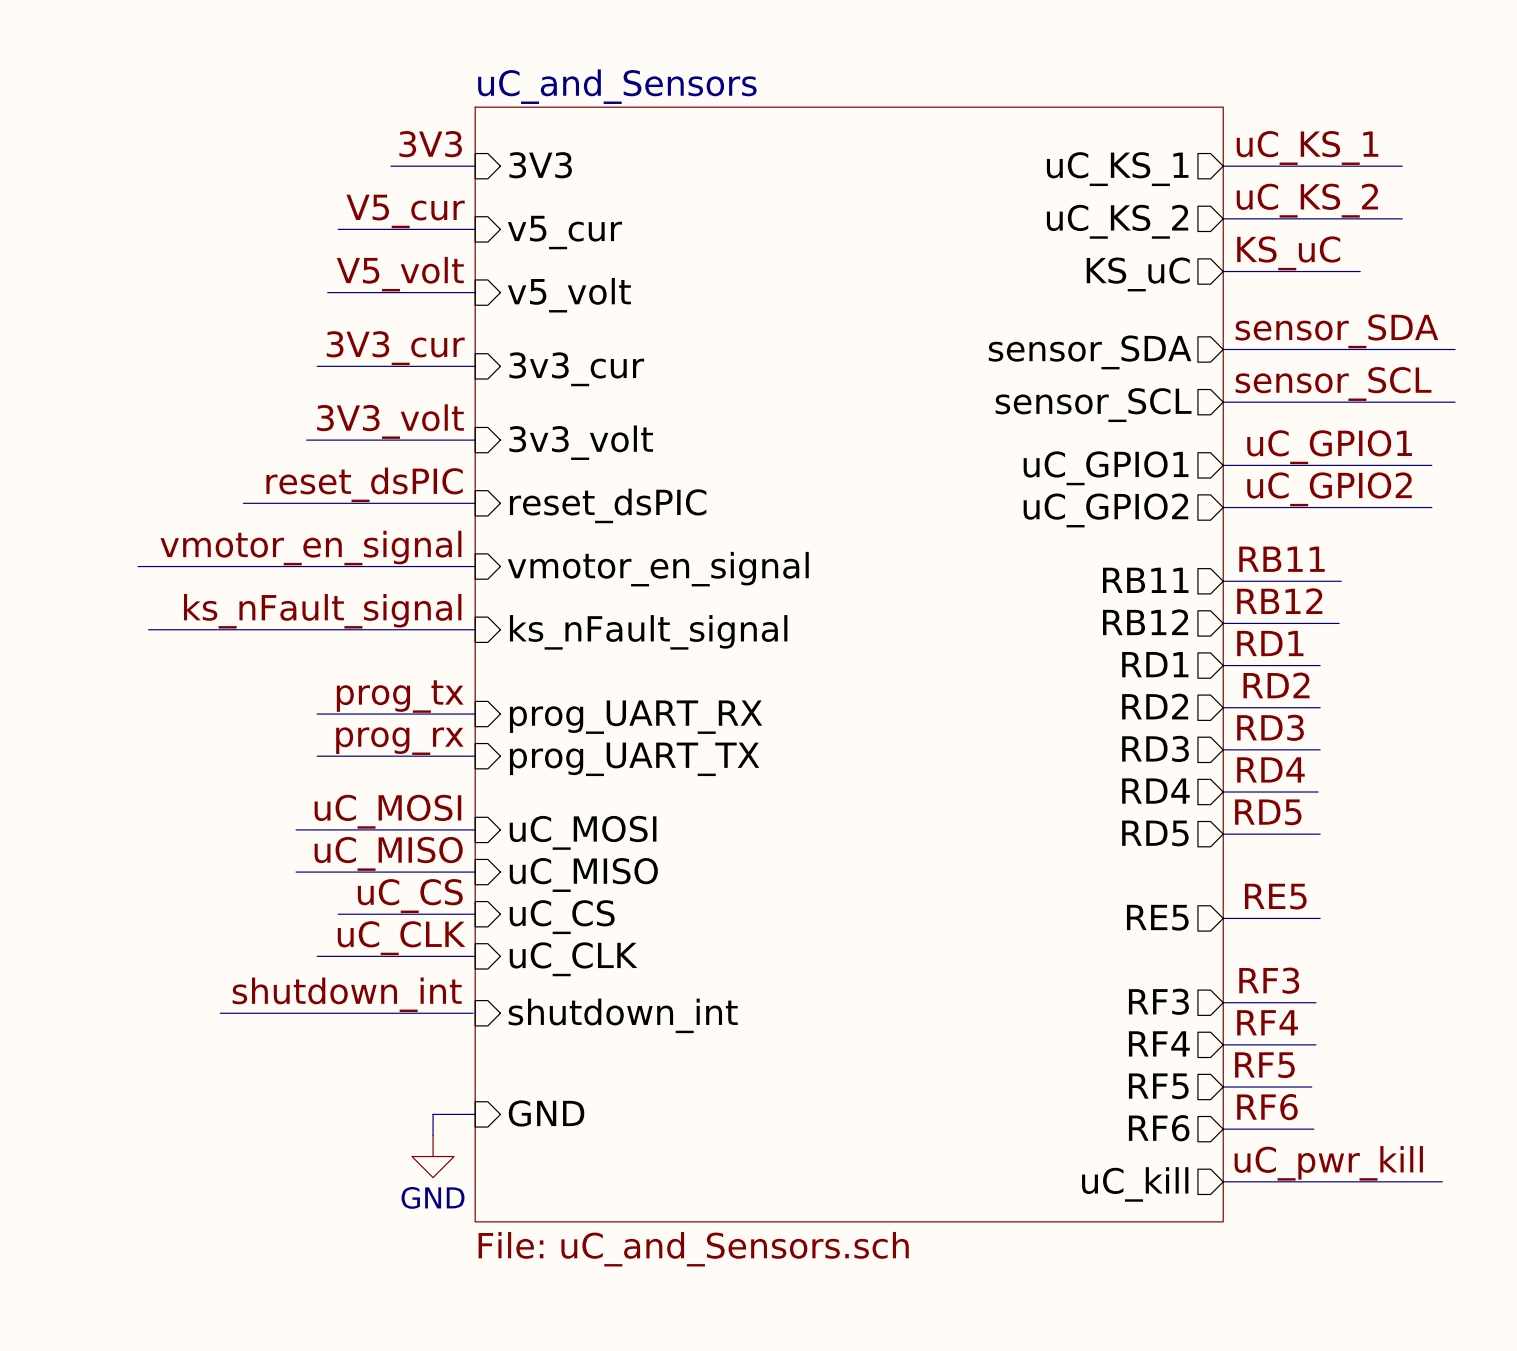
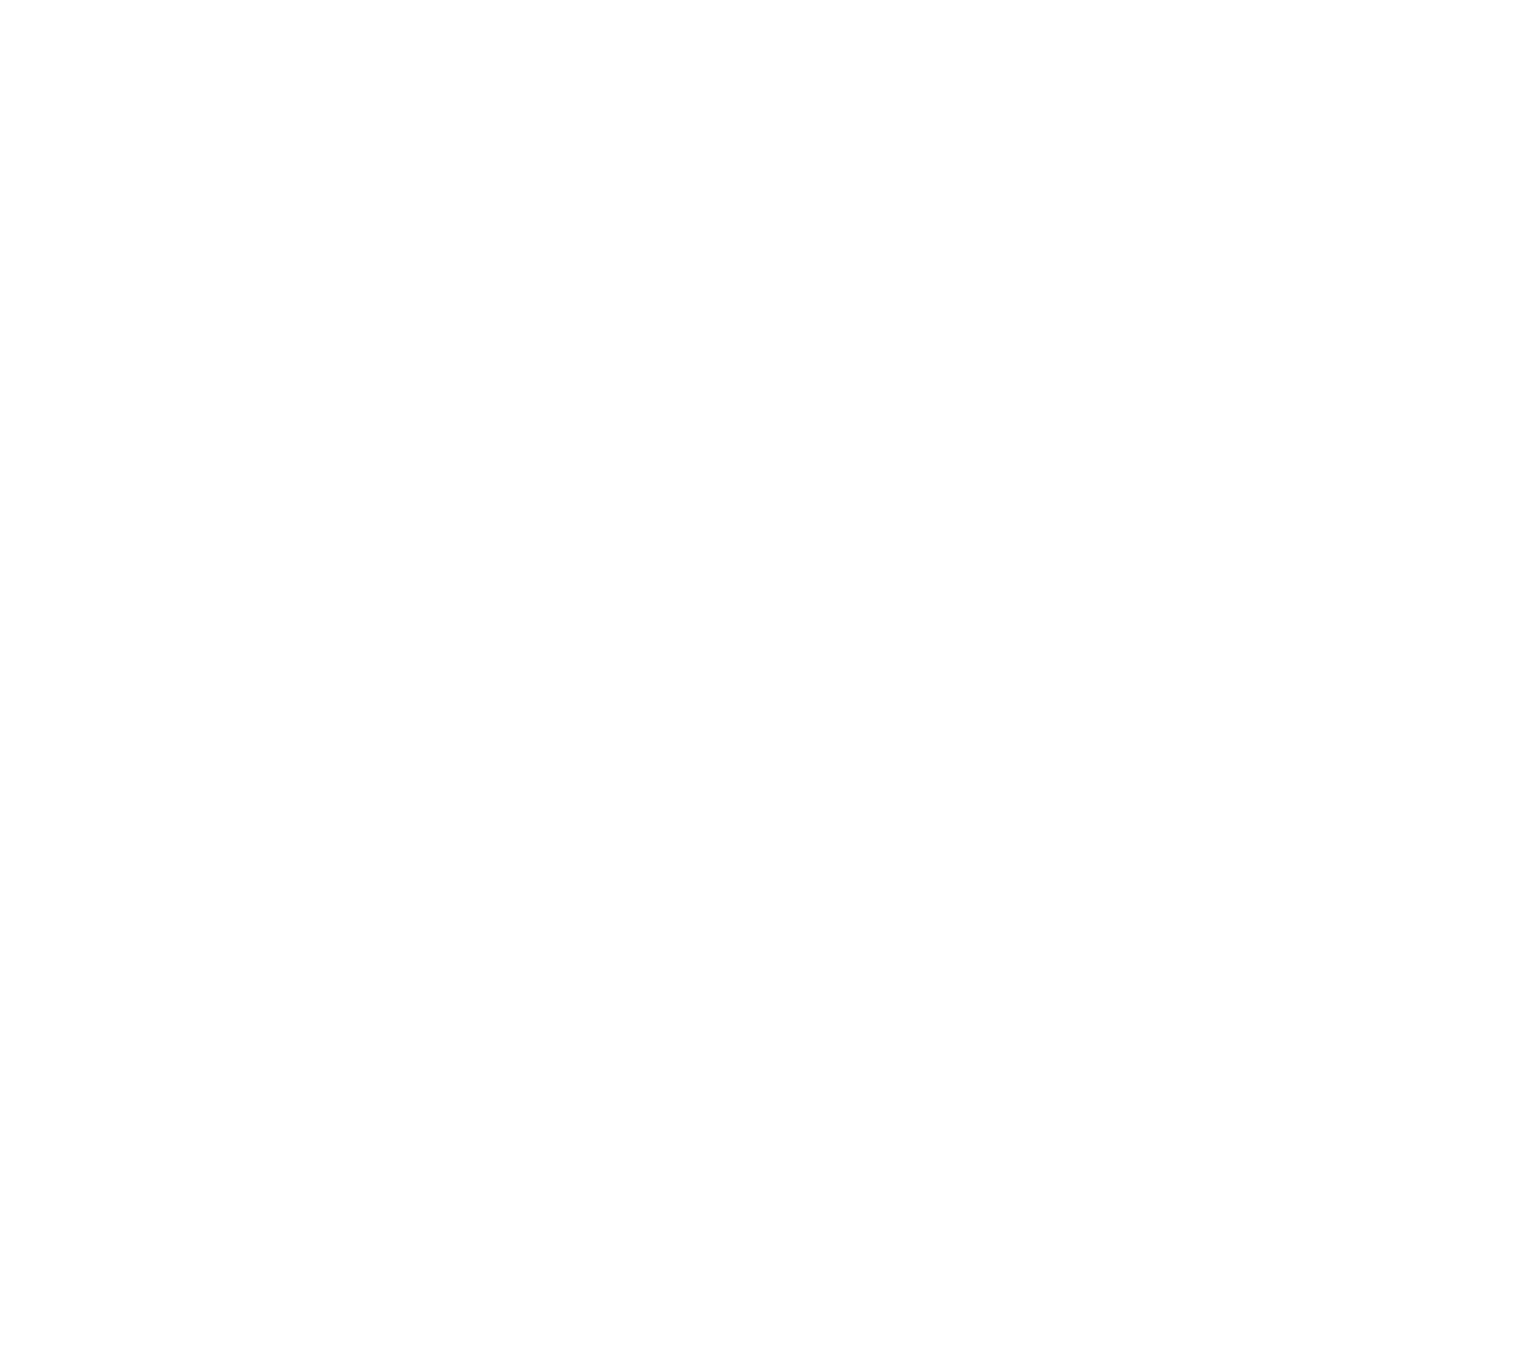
label: 3V3 (430, 144) -> none
label: uC_KS_1 (1307, 147) -> none
sheet pin: 3V3 (540, 165) -> none
wire: (390, 166) (475, 166) -> none
wire: (1223, 166) (1402, 166) -> none
sheet pin: uC_KS_1 (1117, 169) -> none
label: uC_KS_2 (1307, 200) -> none
label: V5_cur (405, 211) -> none
wire: (1223, 218) (1402, 218) -> none
sheet pin: uC_KS_2 (1117, 221) -> none
wire: (338, 229) (475, 229) -> none
sheet pin: v5_cur (564, 232) -> none
label: KS_uC (1288, 253) -> none
wire: (1223, 271) (1360, 271) -> none
label: V5_volt (400, 274) -> none
sheet pin: KS_uC (1138, 274) -> none
wire: (327, 292) (475, 292) -> none
sheet pin: v5_volt (569, 295) -> none
label: sensor_SDA (1336, 331) -> none
label: 3V3_cur (395, 348) -> none
wire: (1223, 349) (1455, 349) -> none
sheet pin: sensor_SDA (1090, 352) -> none
wire: (317, 366) (475, 366) -> none
sheet pin: 3v3_cur (576, 369) -> none
label: sensor_SCL (1333, 383) -> none
wire: (1223, 402) (1455, 402) -> none
sheet pin: sensor_SCL (1093, 405) -> none
label: 3V3_volt (390, 421) -> none
wire: (306, 440) (475, 440) -> none
sheet pin: 3v3_volt (581, 442) -> none
label: uC_GPIO1 (1329, 447) -> none
wire: (1223, 465) (1431, 465) -> none
sheet pin: uC_GPIO1 (1106, 468) -> none
label: reset_dsPIC (364, 484) -> none
label: uC_GPIO2 (1329, 489) -> none
wire: (243, 503) (475, 503) -> none
sheet pin: reset_dsPIC (608, 505) -> none
wire: (1223, 507) (1431, 507) -> none
sheet pin: uC_GPIO2 (1105, 510) -> none
label: vmotor_en_signal (310, 548) -> none
label: RB11 (1282, 559) -> none
wire: (138, 566) (475, 566) -> none
sheet pin: vmotor_en_signal (658, 569) -> none
sheet pin: RB11 (1145, 580) -> none
wire: (1223, 581) (1341, 581) -> none
label: RB12 (1279, 601) -> none
label: ks_nFault_signal (322, 611) -> none
sheet pin: RB12 (1145, 622) -> none
wire: (1223, 623) (1339, 623) -> none
wire: (148, 629) (475, 629) -> none
sheet pin: ks_nFault_signal (648, 632) -> none
label: RD1 (1270, 643) -> none
sheet uC_and_Sensors: File: uC_and_Sensors.sch (849, 664) -> none
sheet pin: RD1 (1155, 664) -> none
wire: (1223, 665) (1320, 665) -> none
label: RD2 (1276, 685) -> none
label: prog_tx (400, 696) -> none
sheet pin: RD2 (1155, 706) -> none
wire: (1223, 707) (1320, 707) -> none
wire: (317, 714) (475, 714) -> none
sheet pin: prog_UART_RX (636, 717) -> none
label: RD3 (1270, 727) -> none
label: prog_rx (399, 741) -> none
sheet pin: RD3 (1155, 748) -> none
wire: (1223, 749) (1320, 749) -> none
wire: (317, 756) (475, 756) -> none
sheet pin: prog_UART_TX (634, 759) -> none
label: RD4 (1270, 769) -> none
sheet pin: RD4 (1155, 791) -> none
wire: (1223, 792) (1318, 792) -> none
label: uC_MOSI (387, 811) -> none
label: RD5 (1268, 812) -> none
wire: (296, 829) (475, 829) -> none
sheet pin: uC_MOSI (583, 832) -> none
sheet pin: RD5 (1155, 833) -> none
wire: (1223, 834) (1320, 834) -> none
label: uC_MISO (388, 853) -> none
wire: (296, 872) (475, 872) -> none
sheet pin: uC_MISO (583, 874) -> none
label: uC_CS (410, 896) -> none
label: RE5 (1275, 896) -> none
wire: (338, 914) (475, 914) -> none
sheet pin: uC_CS (562, 917) -> none
sheet pin: RE5 (1157, 917) -> none
wire: (1223, 918) (1320, 918) -> none
label: uC_CLK (401, 938) -> none
wire: (317, 956) (475, 956) -> none
sheet pin: uC_CLK (573, 959) -> none
label: RF3 (1269, 980) -> none
label: shutdown_int (347, 994) -> none
sheet pin: RF3 (1158, 1001) -> none
wire: (1223, 1002) (1315, 1002) -> none
wire: (220, 1013) (473, 1013) -> none
sheet pin: shutdown_int (623, 1015) -> none
label: RF4 (1267, 1022) -> none
sheet pin: RF4 (1159, 1043) -> none
wire: (1223, 1044) (1315, 1044) -> none
label: RF5 (1264, 1065) -> none
sheet pin: RF5 (1158, 1086) -> none
wire: (1223, 1087) (1311, 1087) -> none
label: RF6 (1267, 1107) -> none
sheet pin: GND (546, 1113) -> none
wire: (475, 1114) (433, 1114) (433, 1135) -> none
sheet pin: RF6 (1159, 1128) -> none
wire: (1223, 1129) (1313, 1129) -> none
power symbol: GND (433, 1156) -> none
label: uC_pwr_kill (1328, 1163) -> none
wire: (1223, 1181) (1442, 1181) -> none
sheet pin: uC_kill (1135, 1184) -> none

